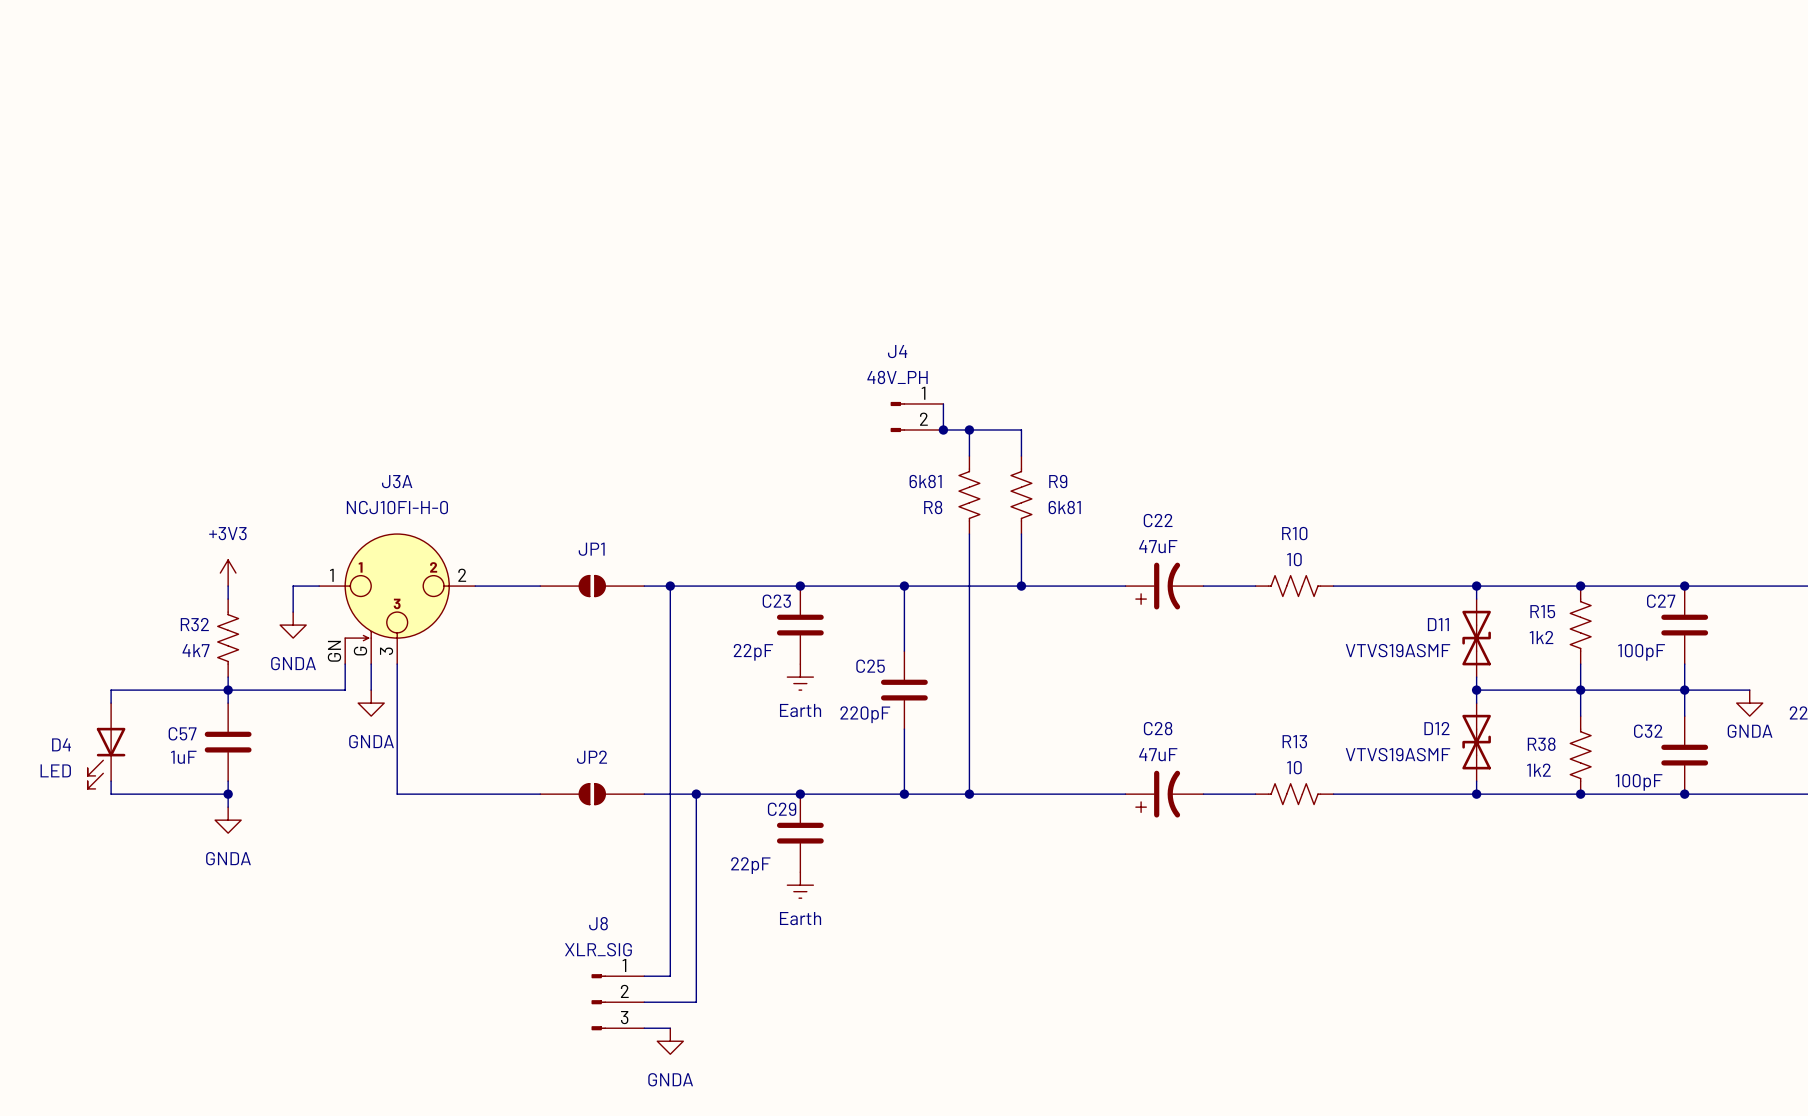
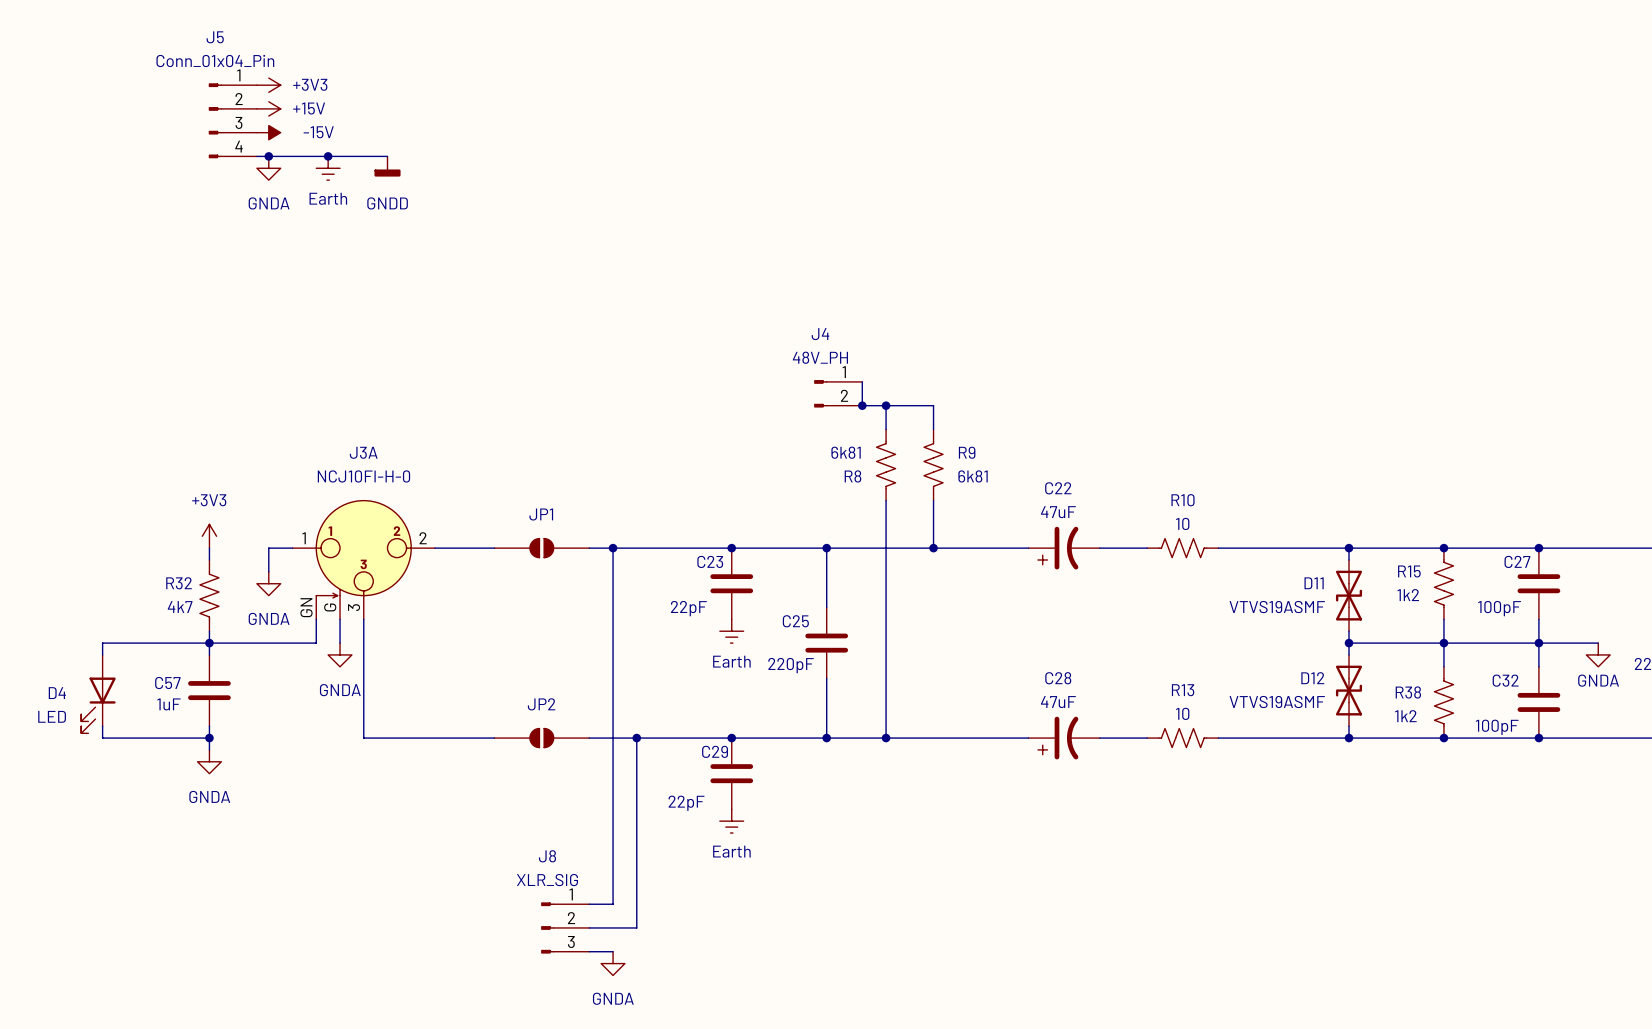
power symbol: none -> +3V3 (268, 85)
power symbol: none -> +15V (268, 108)
J5: none -> Conn_01x04_Pin (232, 120)
power symbol: none -> -15V (268, 132)
wire: none -> (256, 156) (387, 156)
junction: none -> (268, 156)
junction: none -> (328, 156)
power symbol: none -> GNDD (387, 166)
power symbol: none -> GNDA (268, 168)
power symbol: none -> Earth (328, 168)

